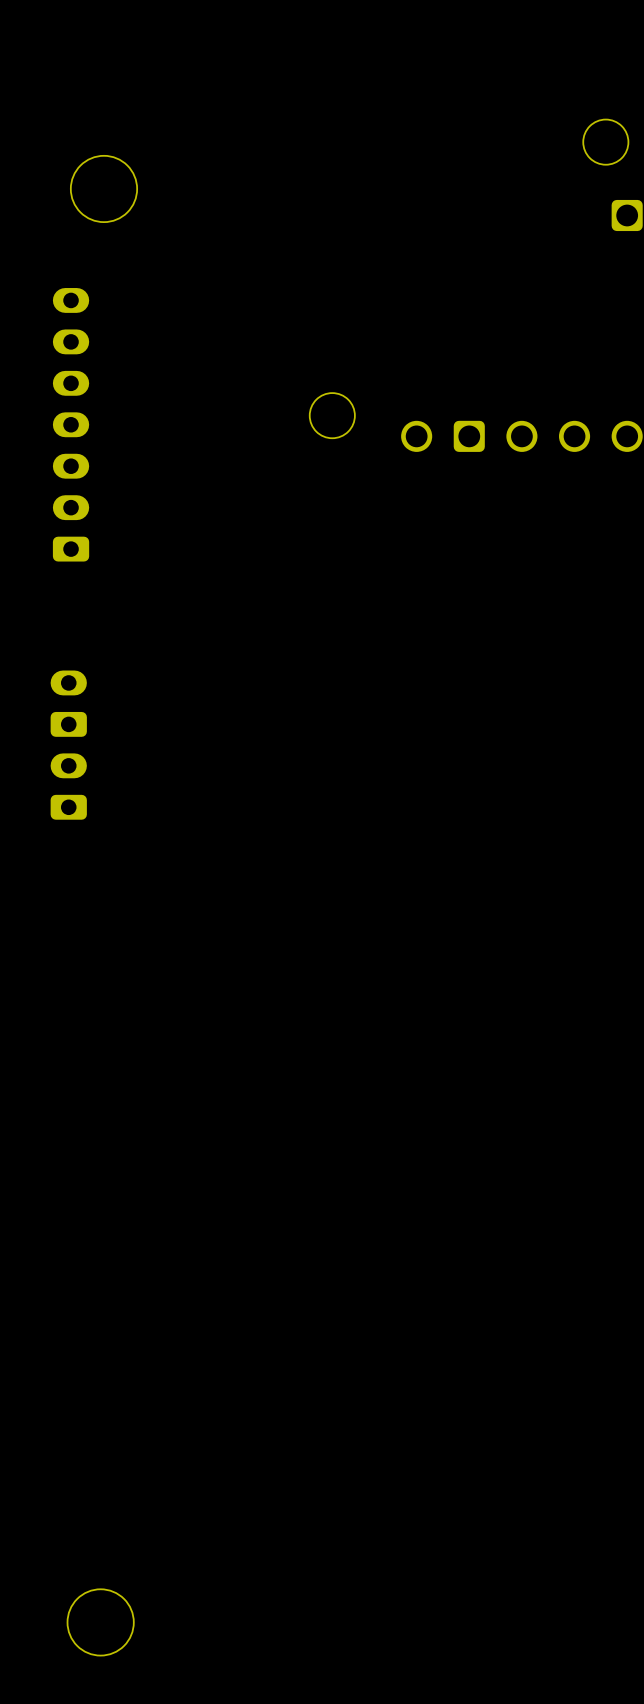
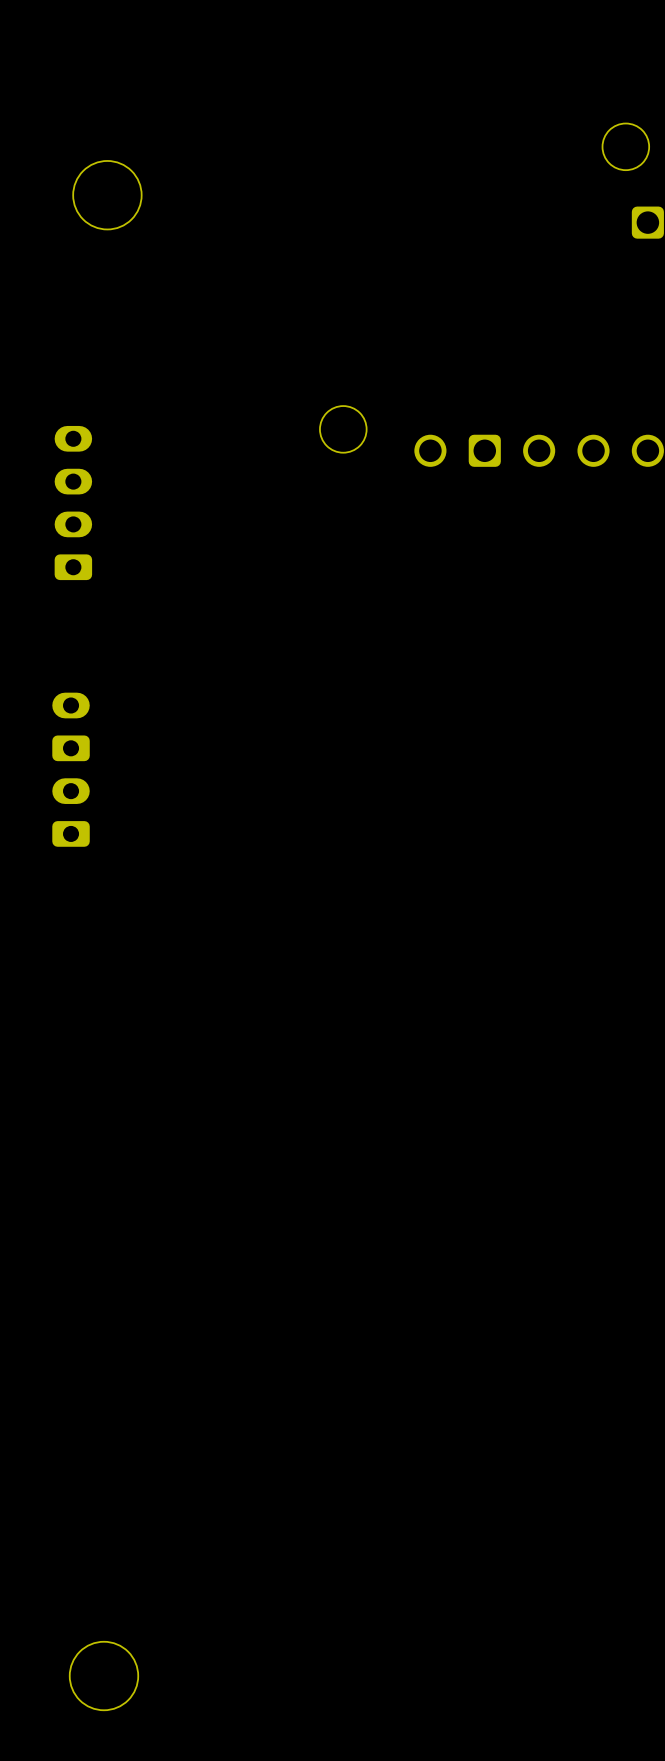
part: (71, 424) -> none

